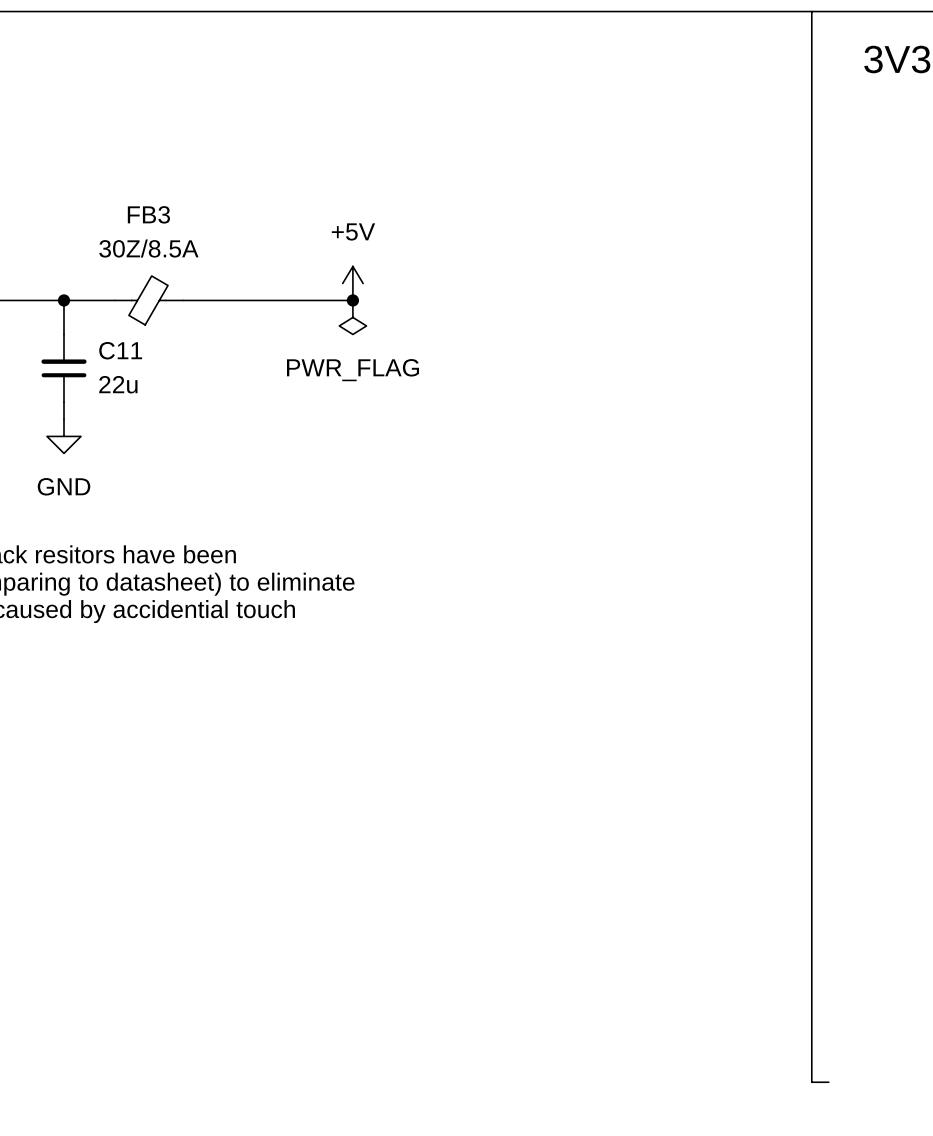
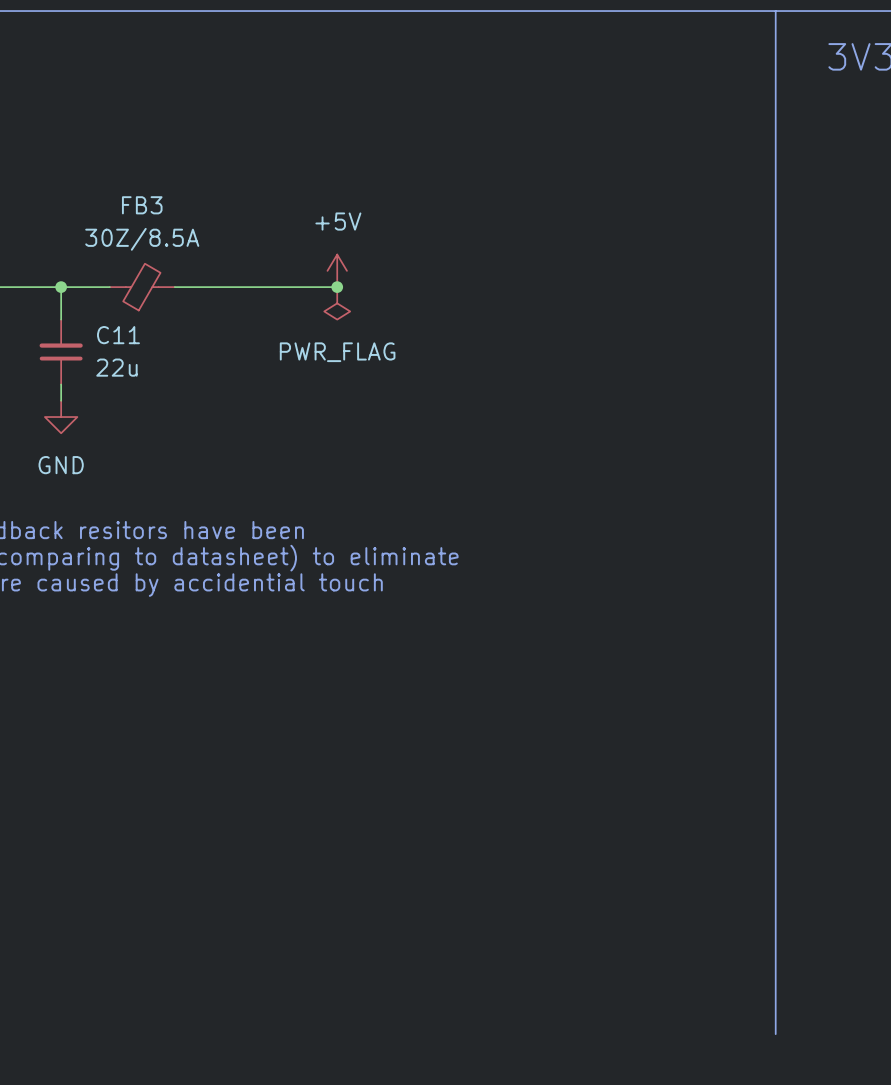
line: (811, 1082) (828, 1082) -> none

